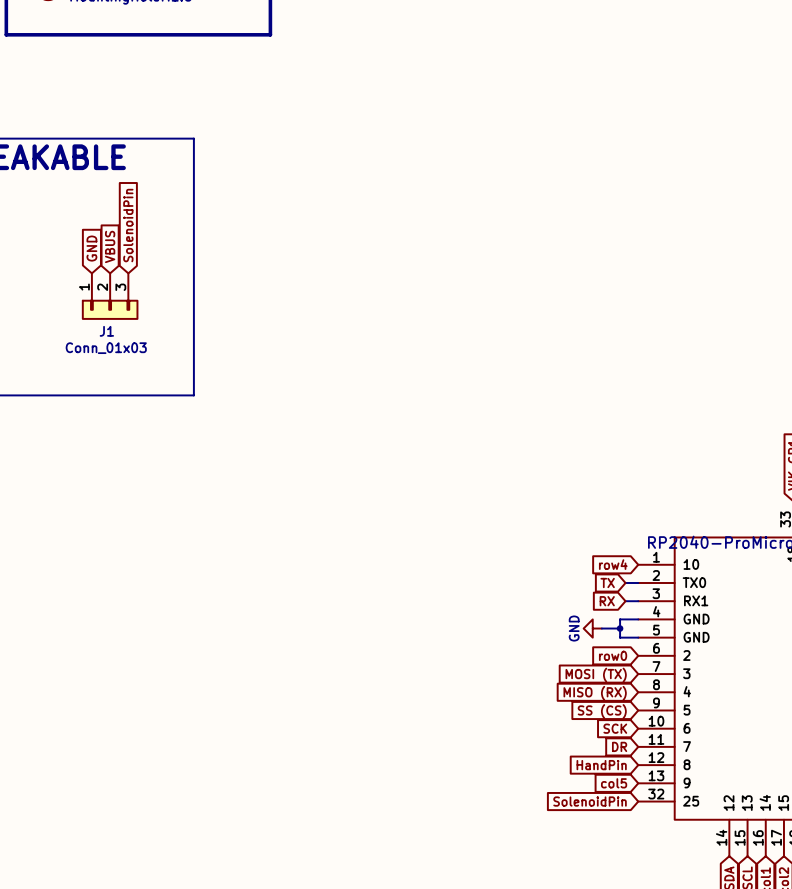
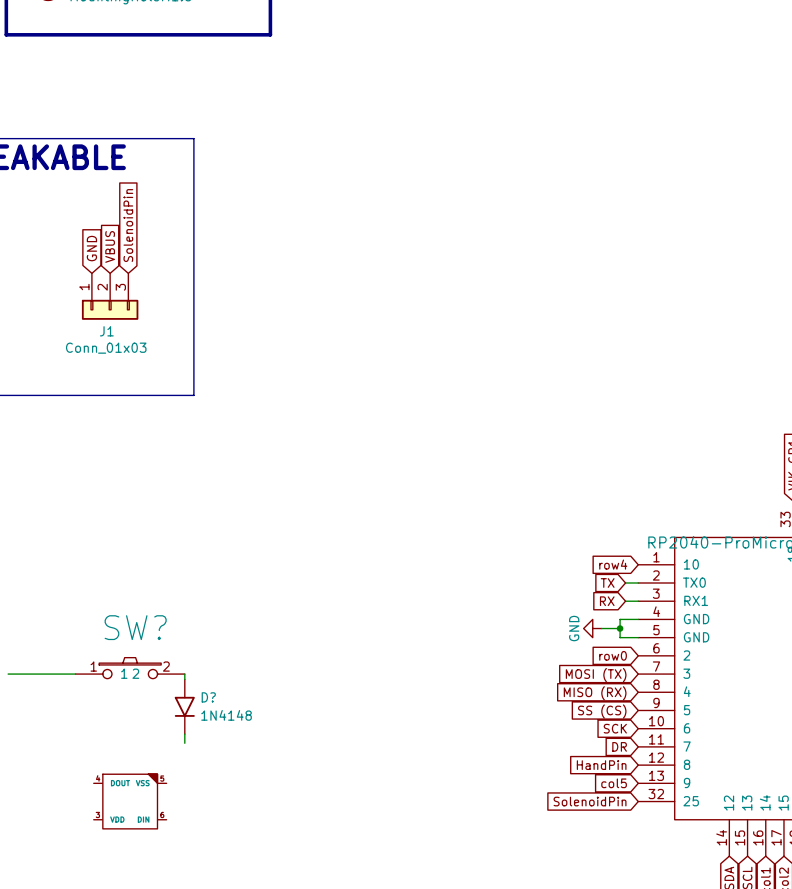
wire: none -> (8, 674) (75, 674)
wire: none -> (184, 674) (184, 679)
D?: none -> 1N4148 (184, 706)
wire: none -> (184, 734) (184, 743)
SW?: none -> (130, 743)

